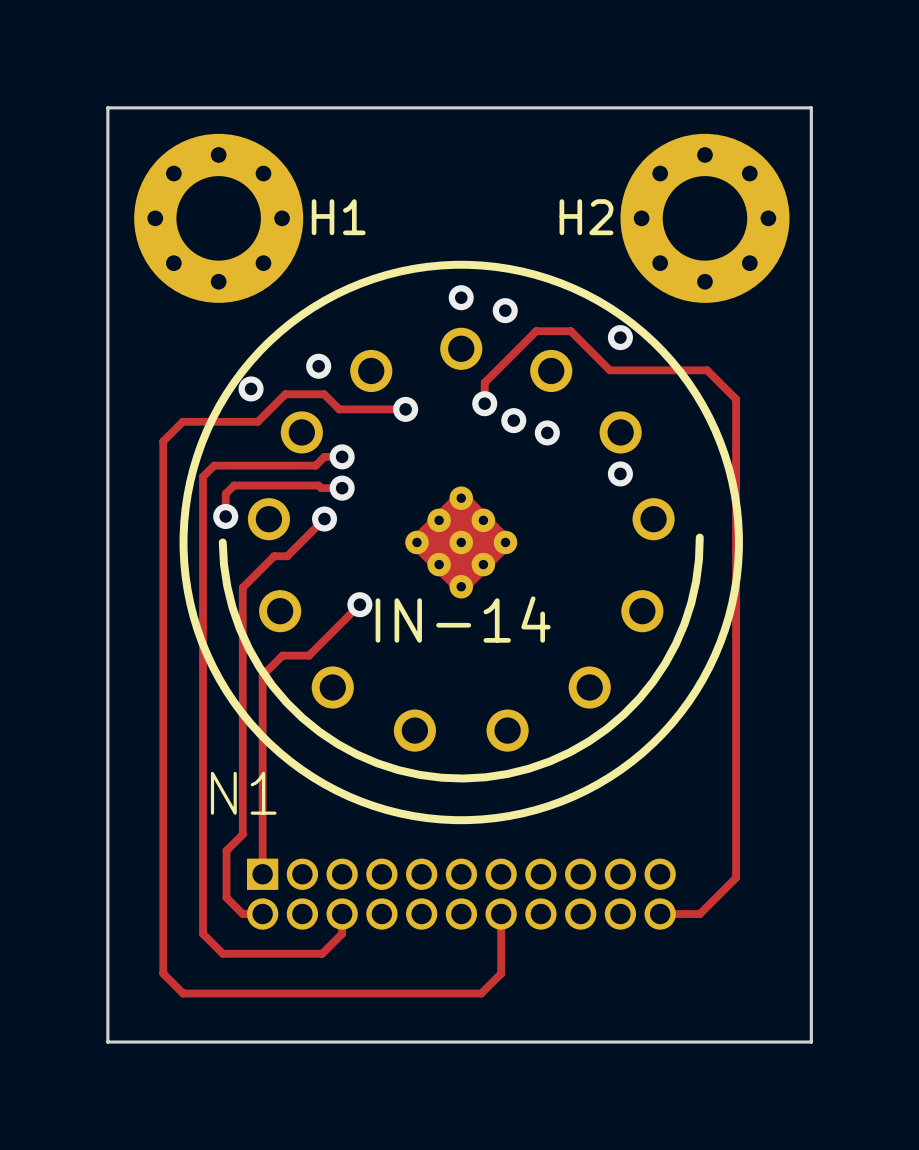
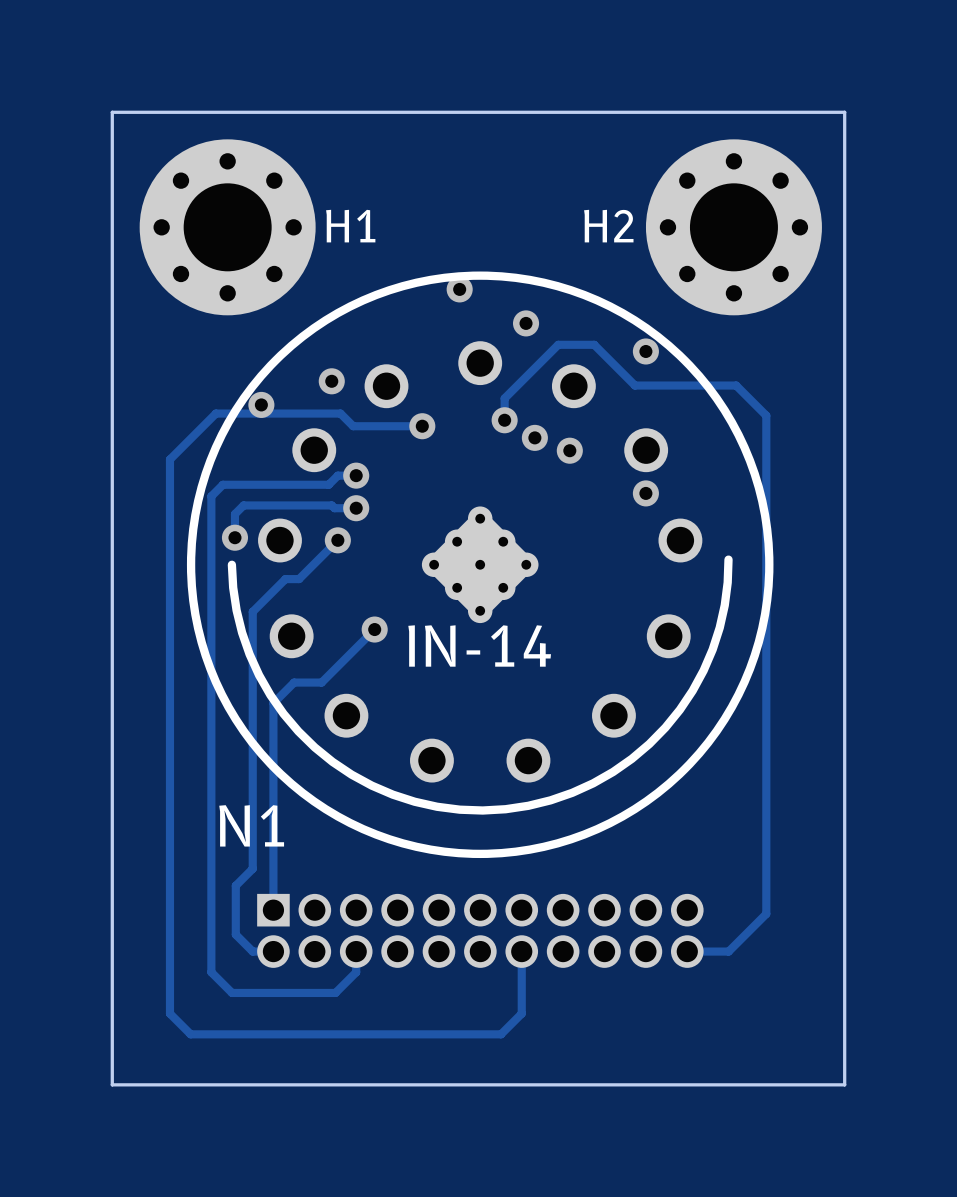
via position: (461, 297) -> (459, 289)
track: (327, 397) (324, 394) (285, 394) (257, 421) (182, 421) -> (340, 413) (215, 413) (190, 439)

